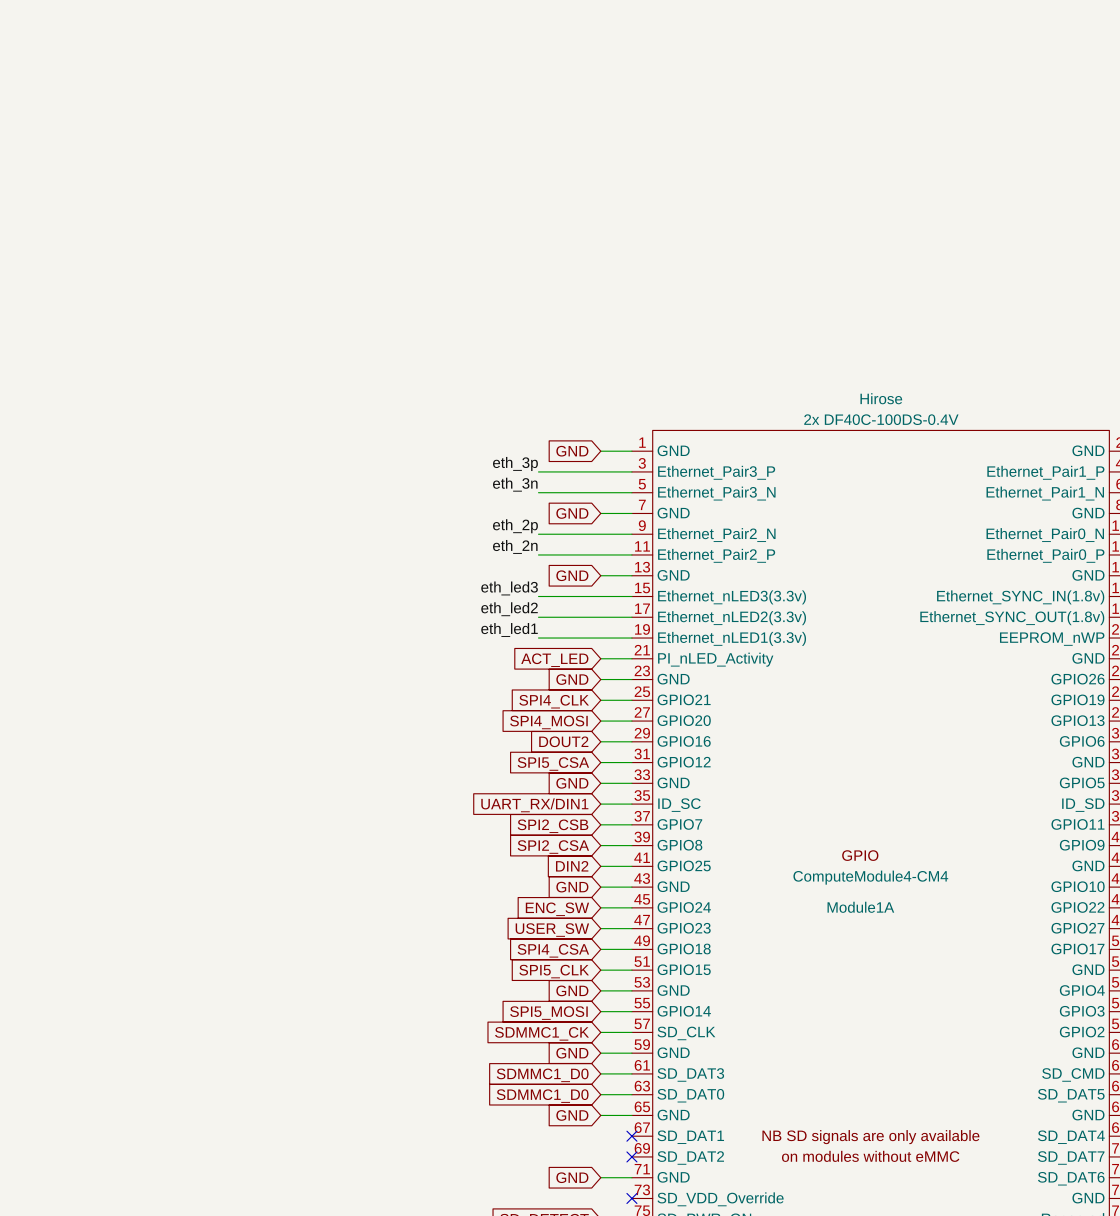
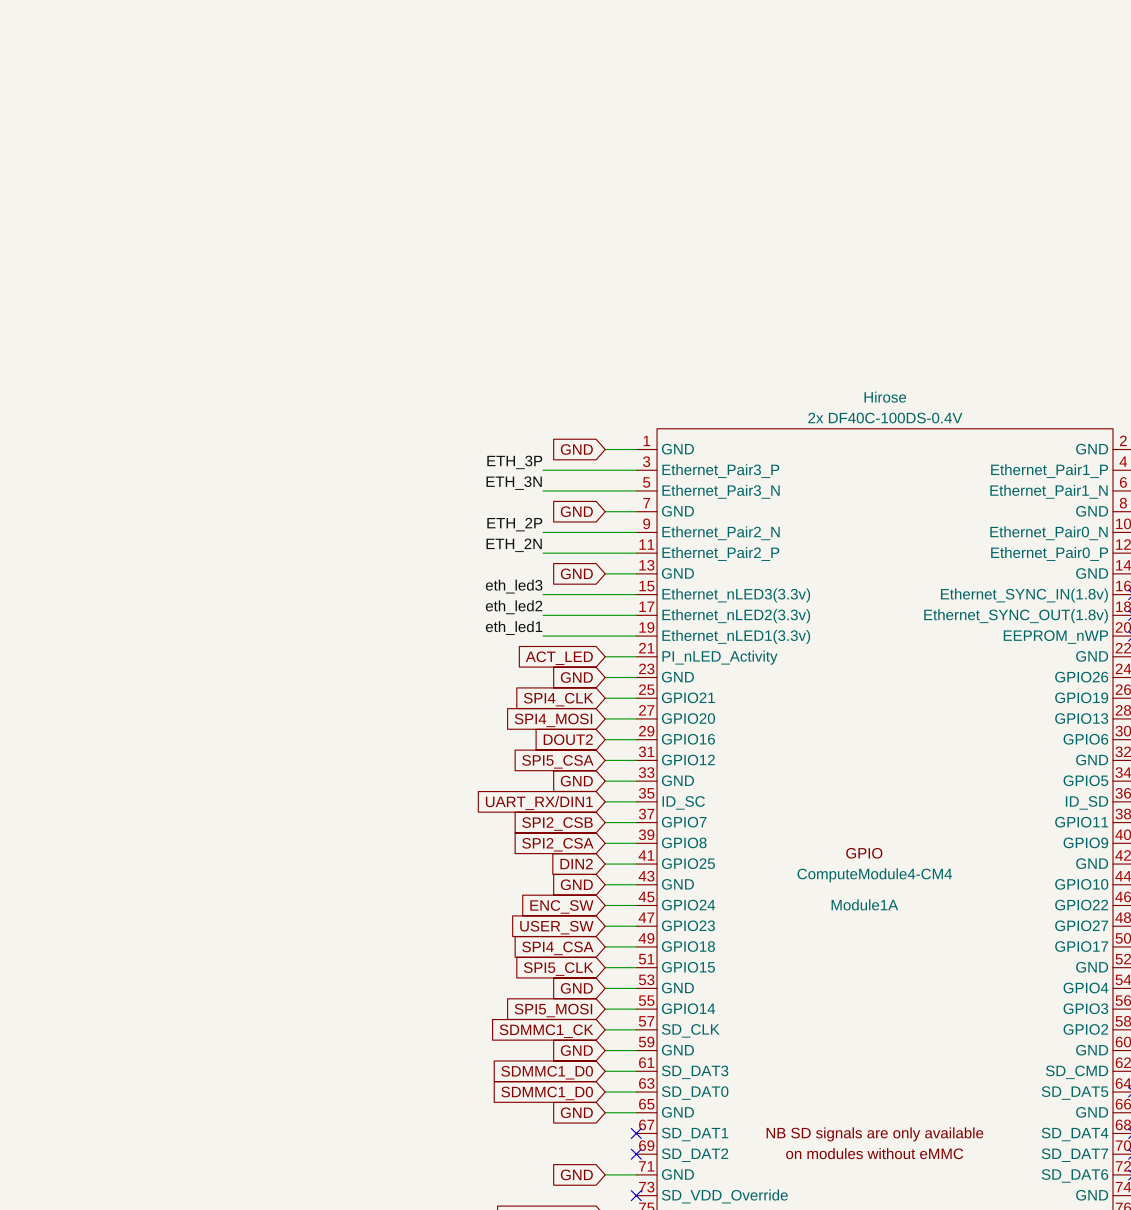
label: eth_3p (515, 463) -> ETH_3P (514, 462)
label: eth_3n (515, 484) -> ETH_3N (514, 483)
label: eth_2p (515, 526) -> ETH_2P (514, 524)
label: eth_2n (515, 546) -> ETH_2N (514, 545)

